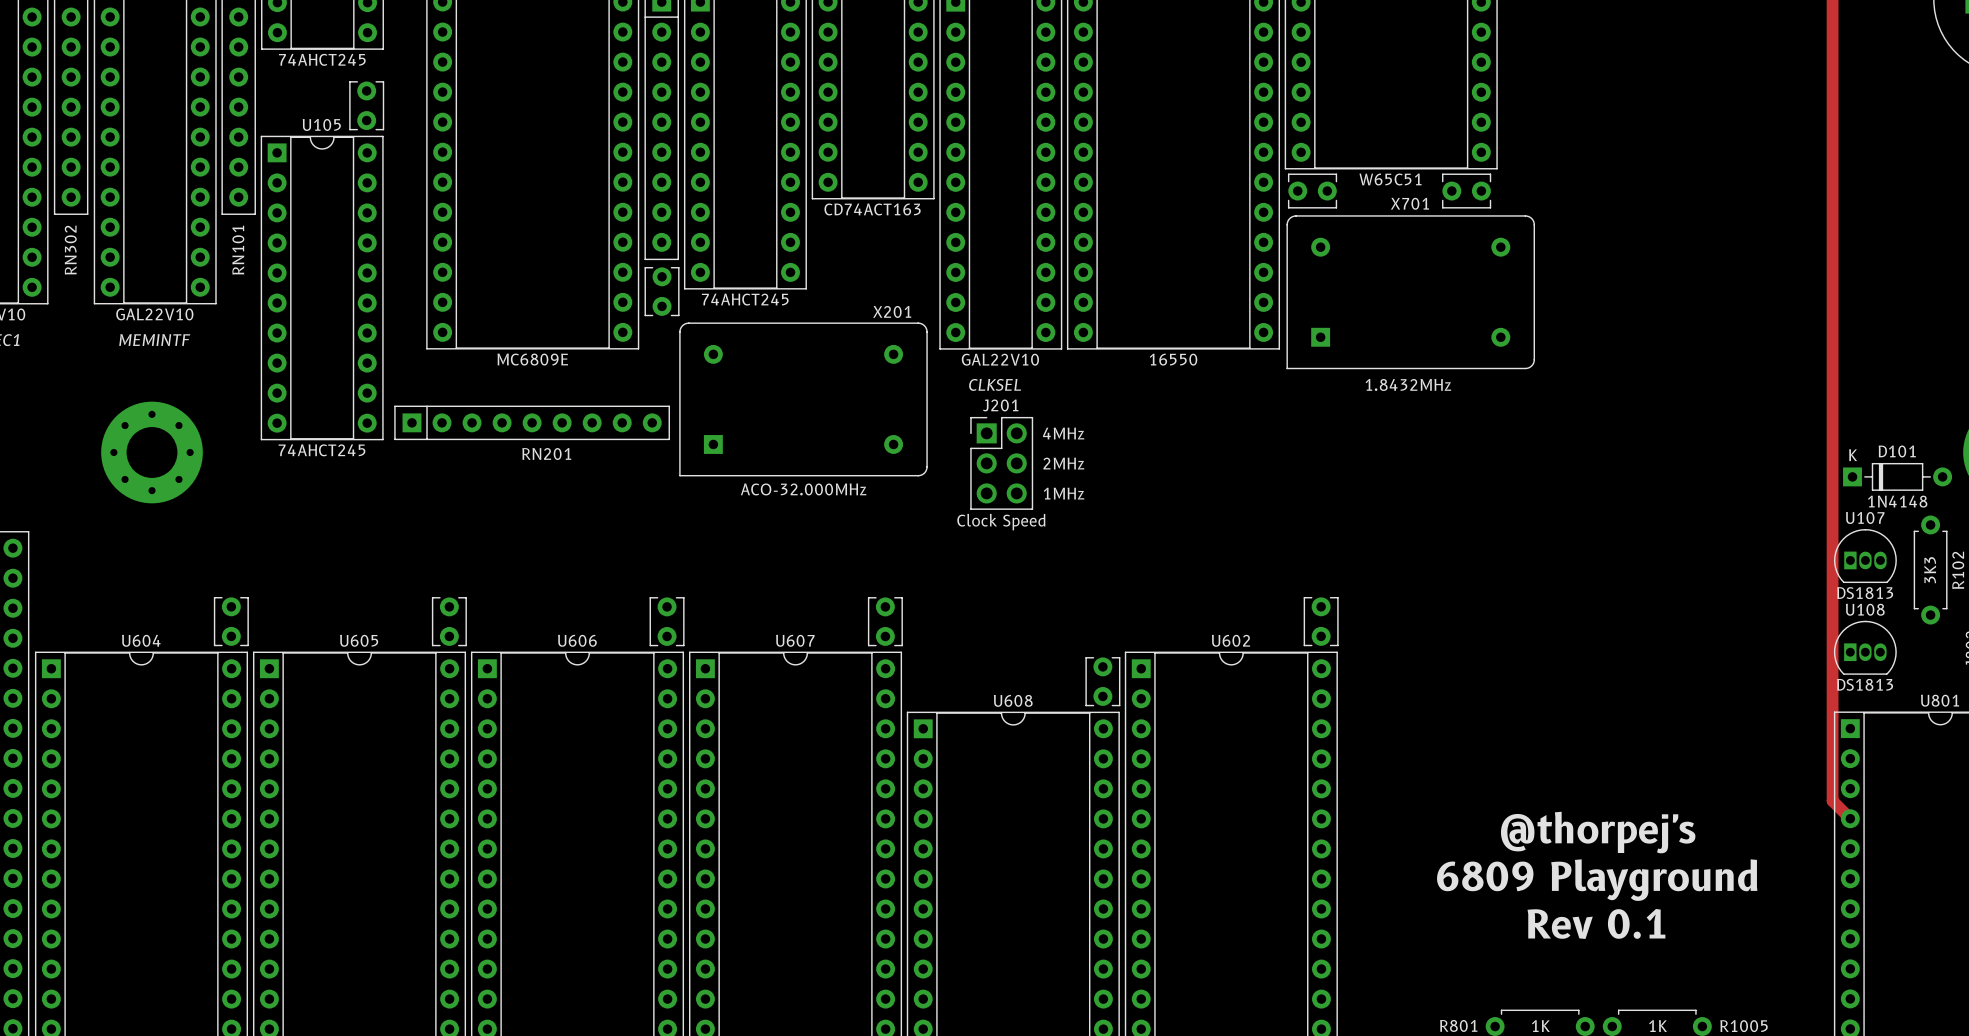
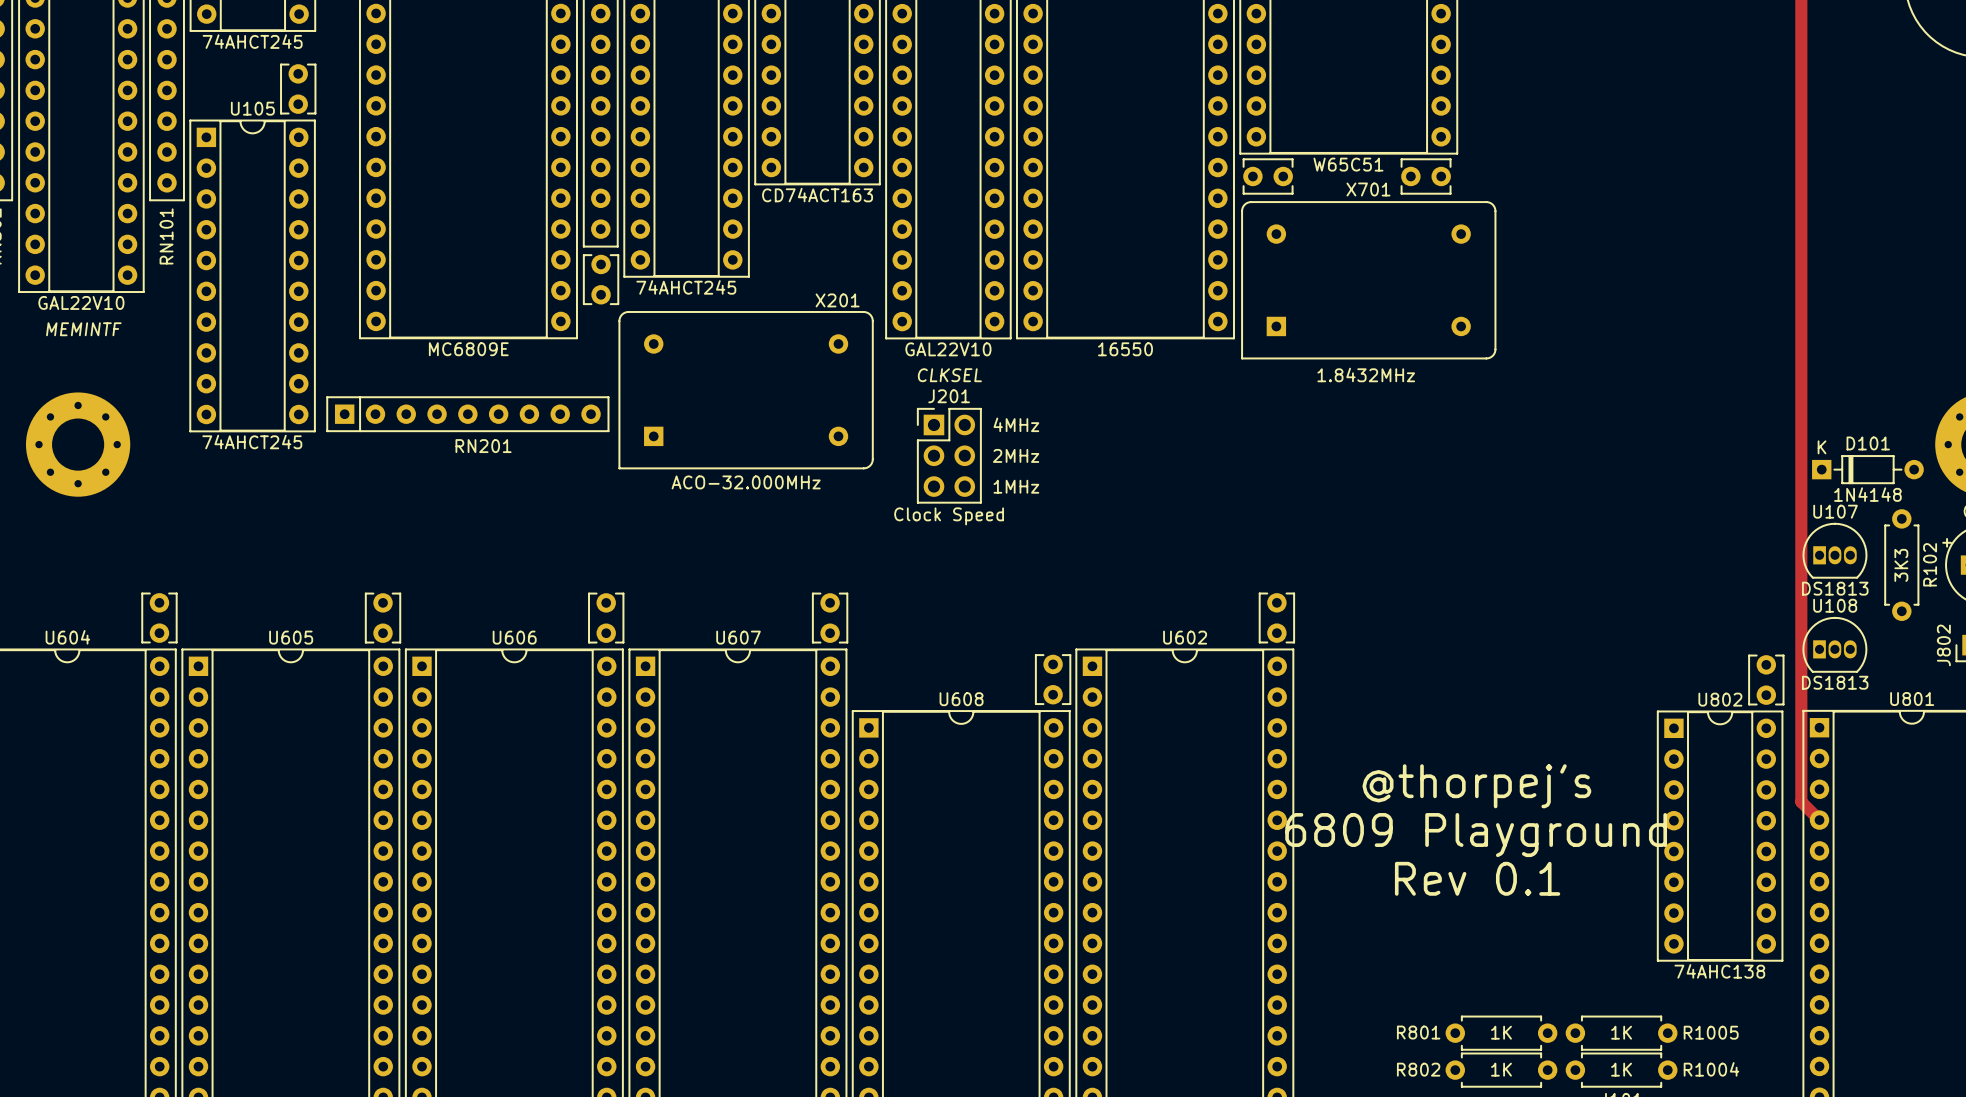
part: none -> (1766, 680)
text position: @thorpej's (1598, 832) -> @thorpej's (1476, 786)
U802: none -> 74AHC138 (1720, 836)
text position: 6809 Playground (1597, 880) -> 6809 Playground (1476, 835)
text position: Rev 0.1 (1596, 923) -> Rev 0.1 (1477, 878)

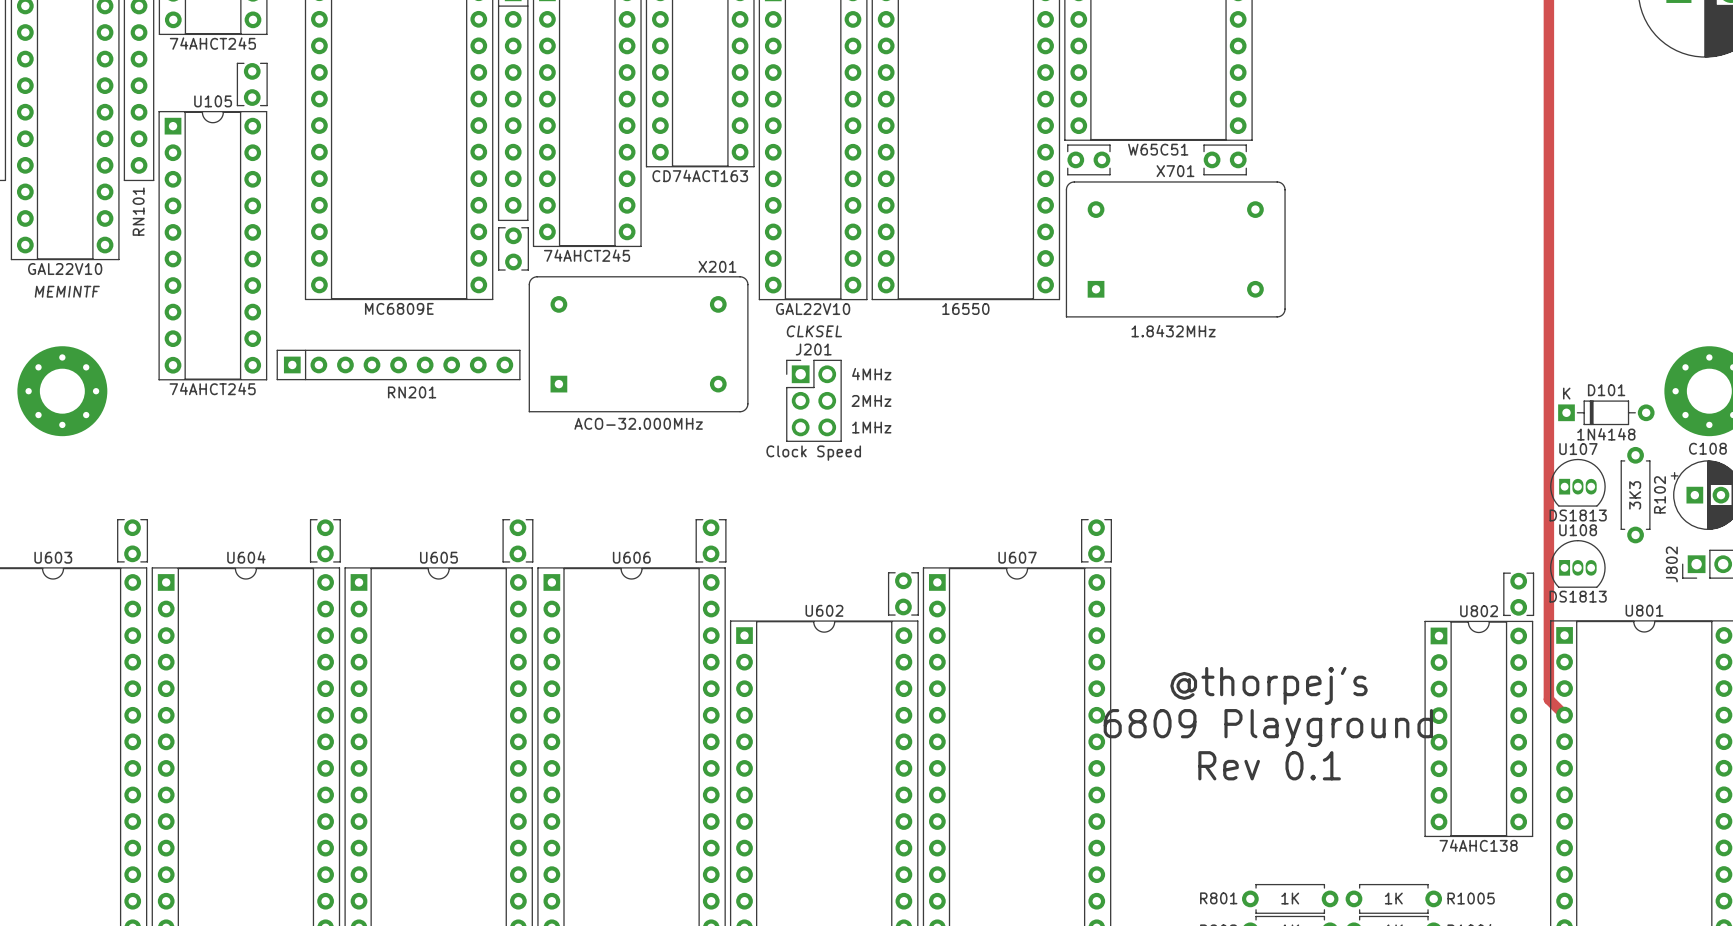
U604 name: U604 (67, 637) -> U603 (53, 557)
U605 name: U605 (291, 637) -> U604 (246, 557)
U606 name: U606 (514, 637) -> U605 (438, 557)
U607 name: U607 (738, 637) -> U606 (631, 557)
U602 name: U602 (1185, 637) -> U607 (1017, 557)
U608 name: U608 (961, 699) -> U602 (824, 610)

